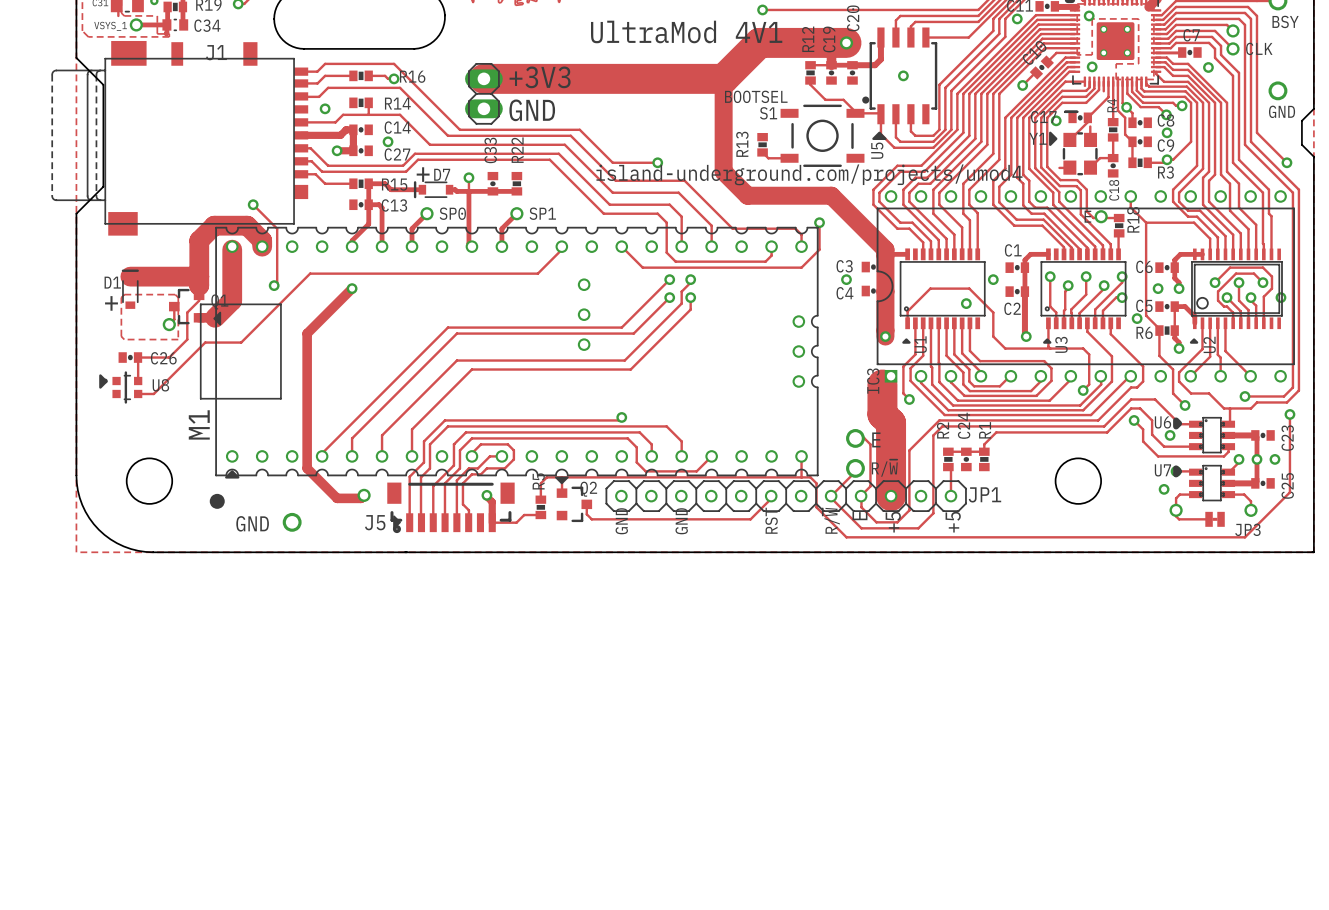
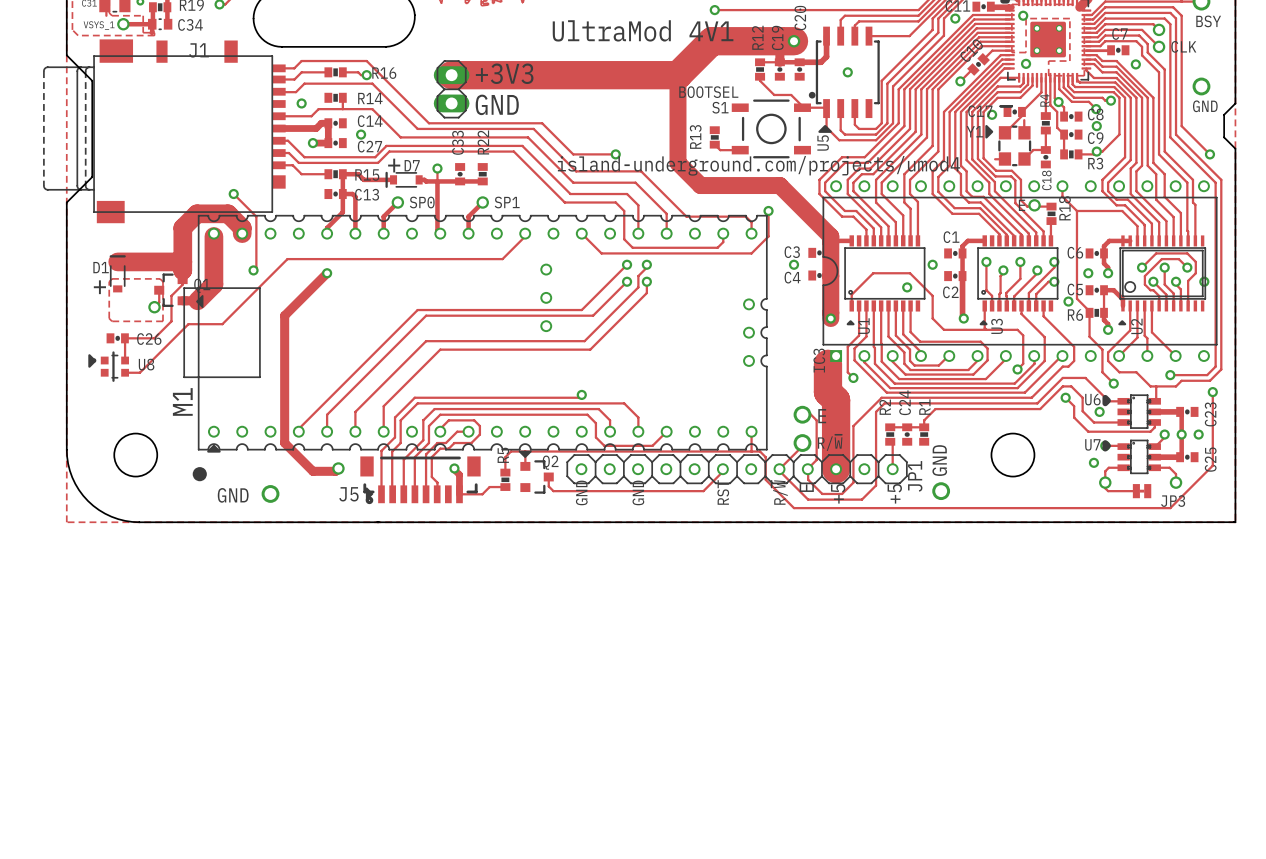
text: none -> GND (939, 460)
JP1 name rotation: 0° (984, 494) -> 90° counterclockwise (915, 476)
part: none -> (941, 491)

